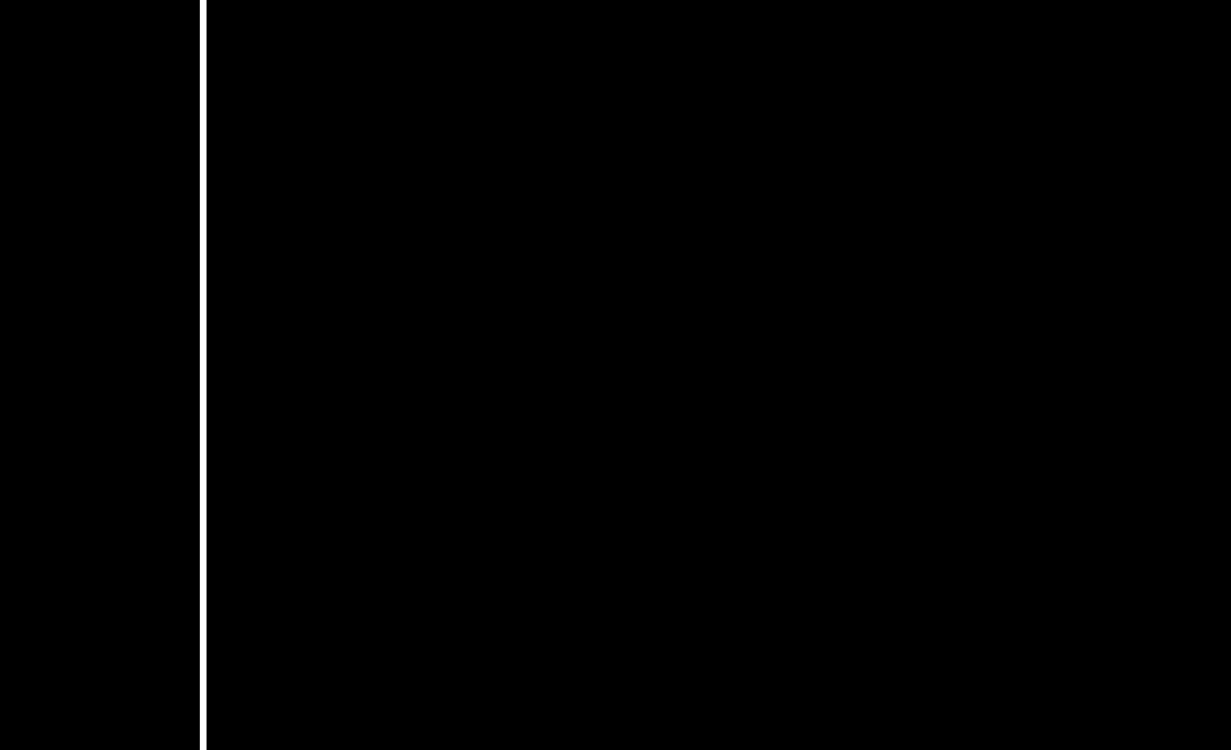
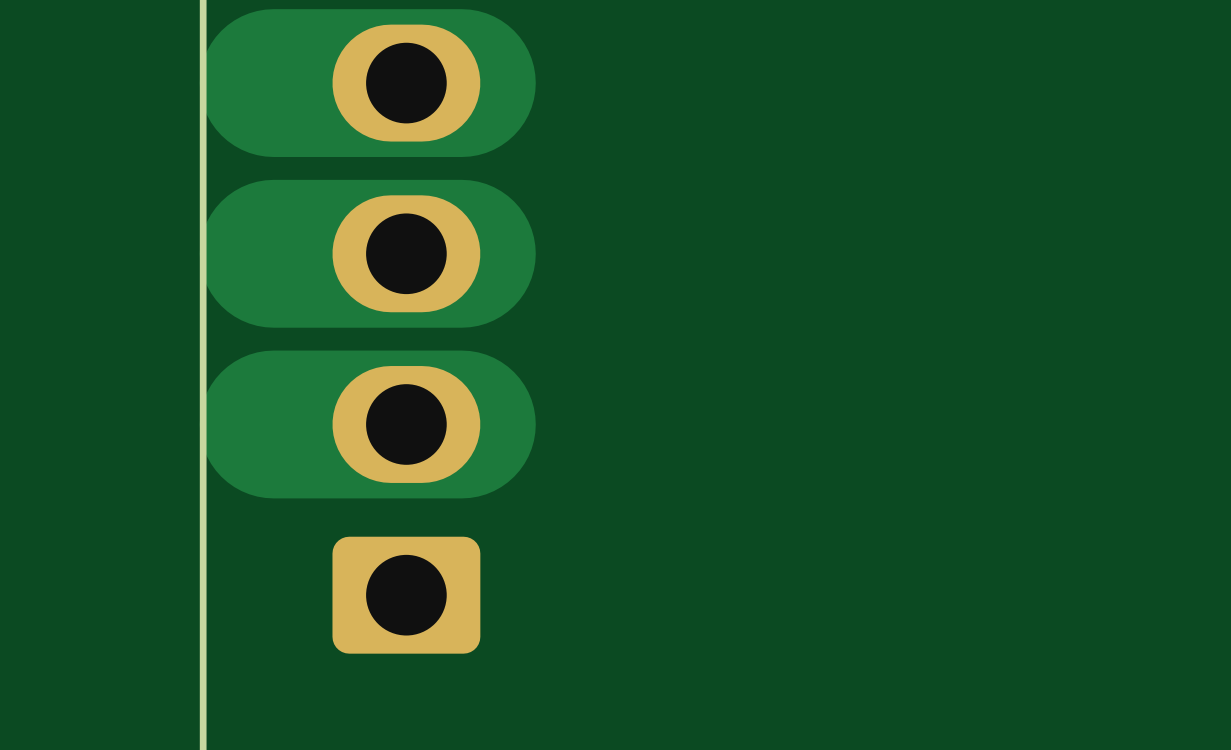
track: none -> (461, 83) (273, 83)
track: none -> (461, 253) (273, 253)
part: none -> (406, 339)
track: none -> (461, 424) (273, 424)

